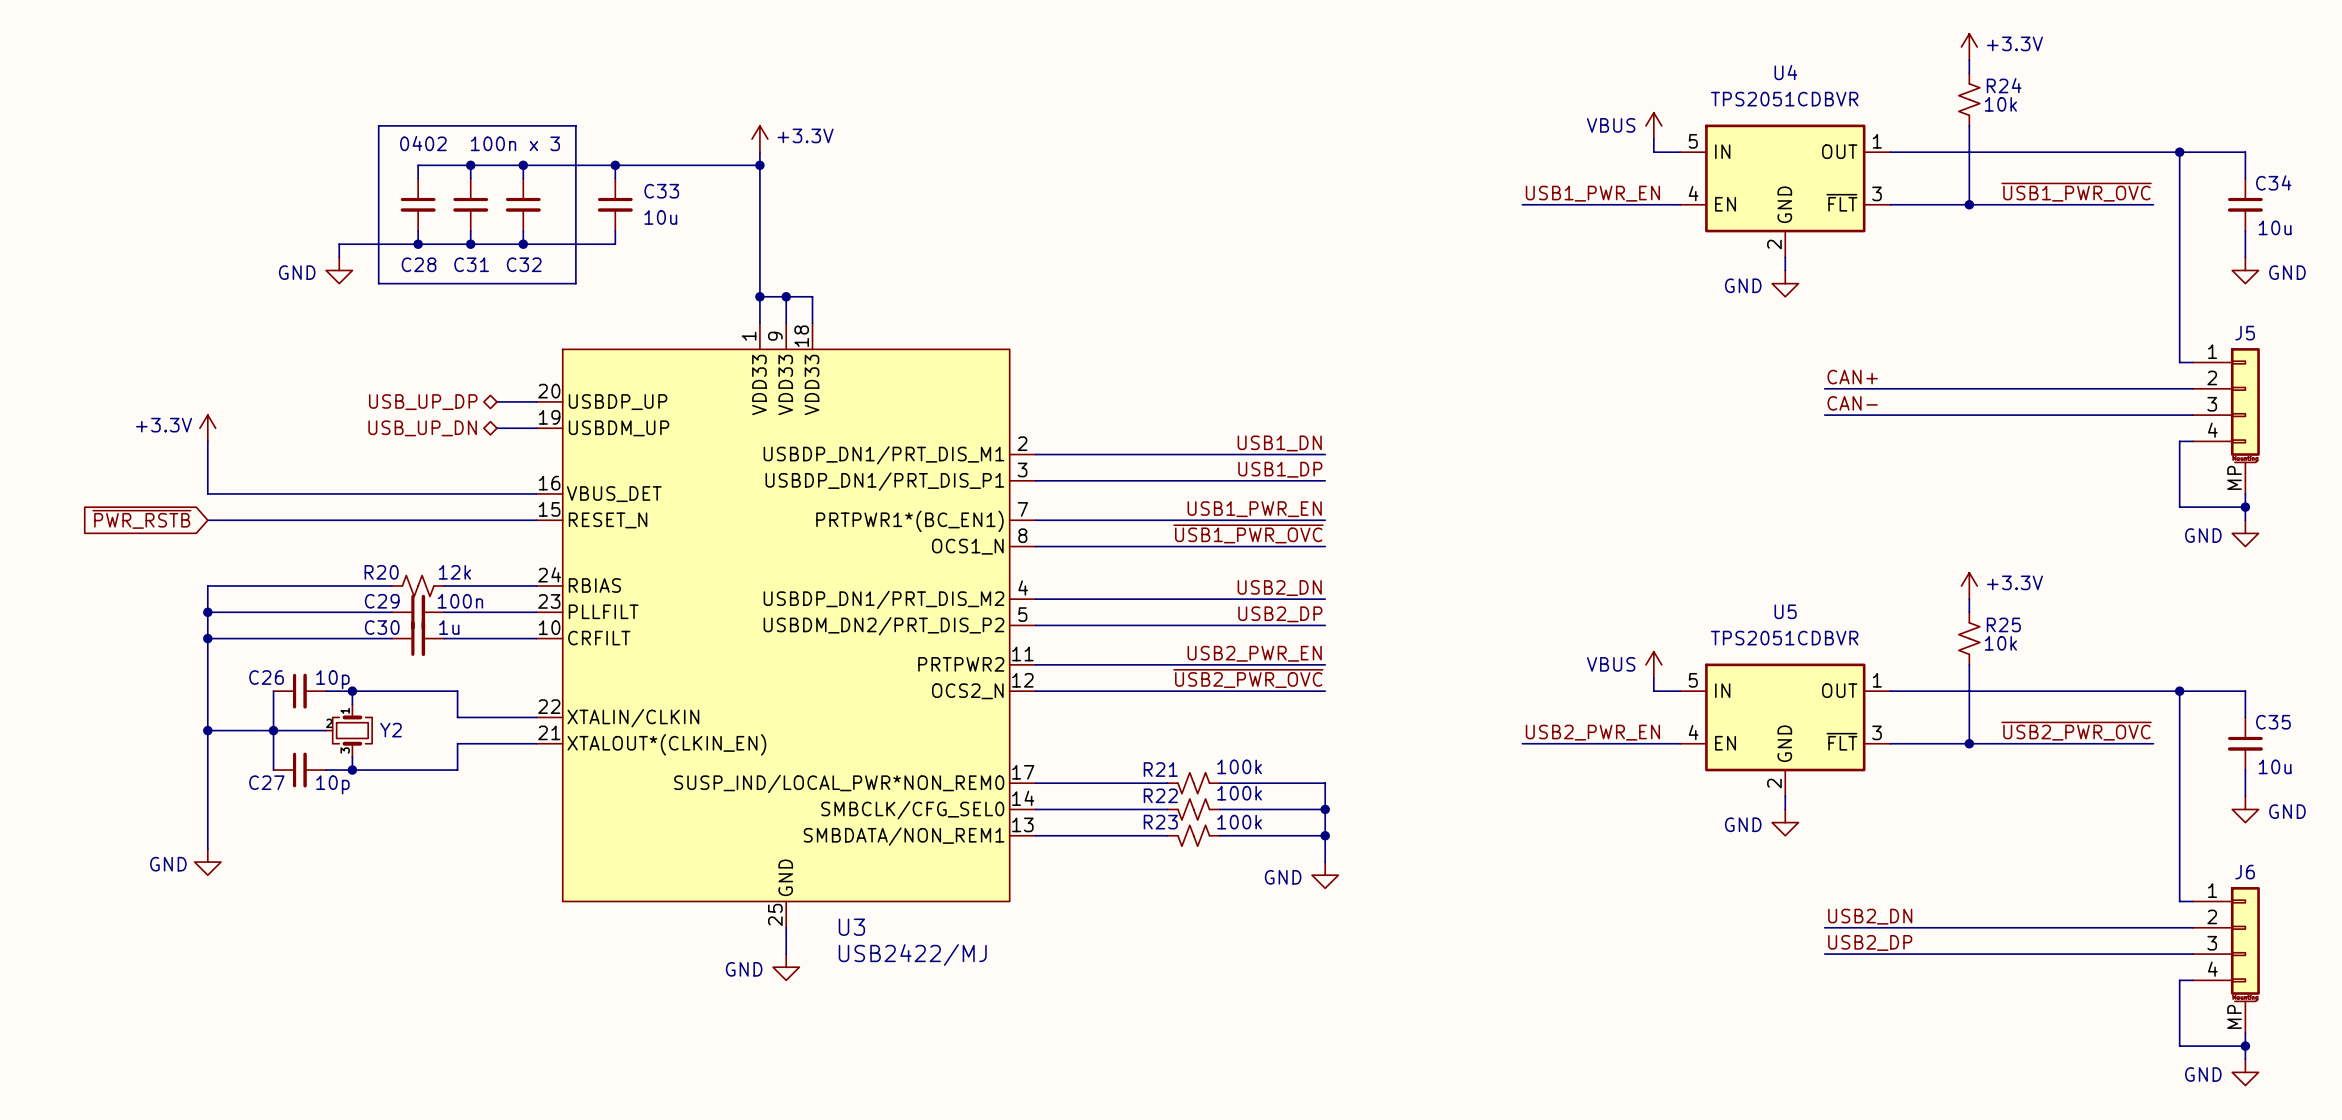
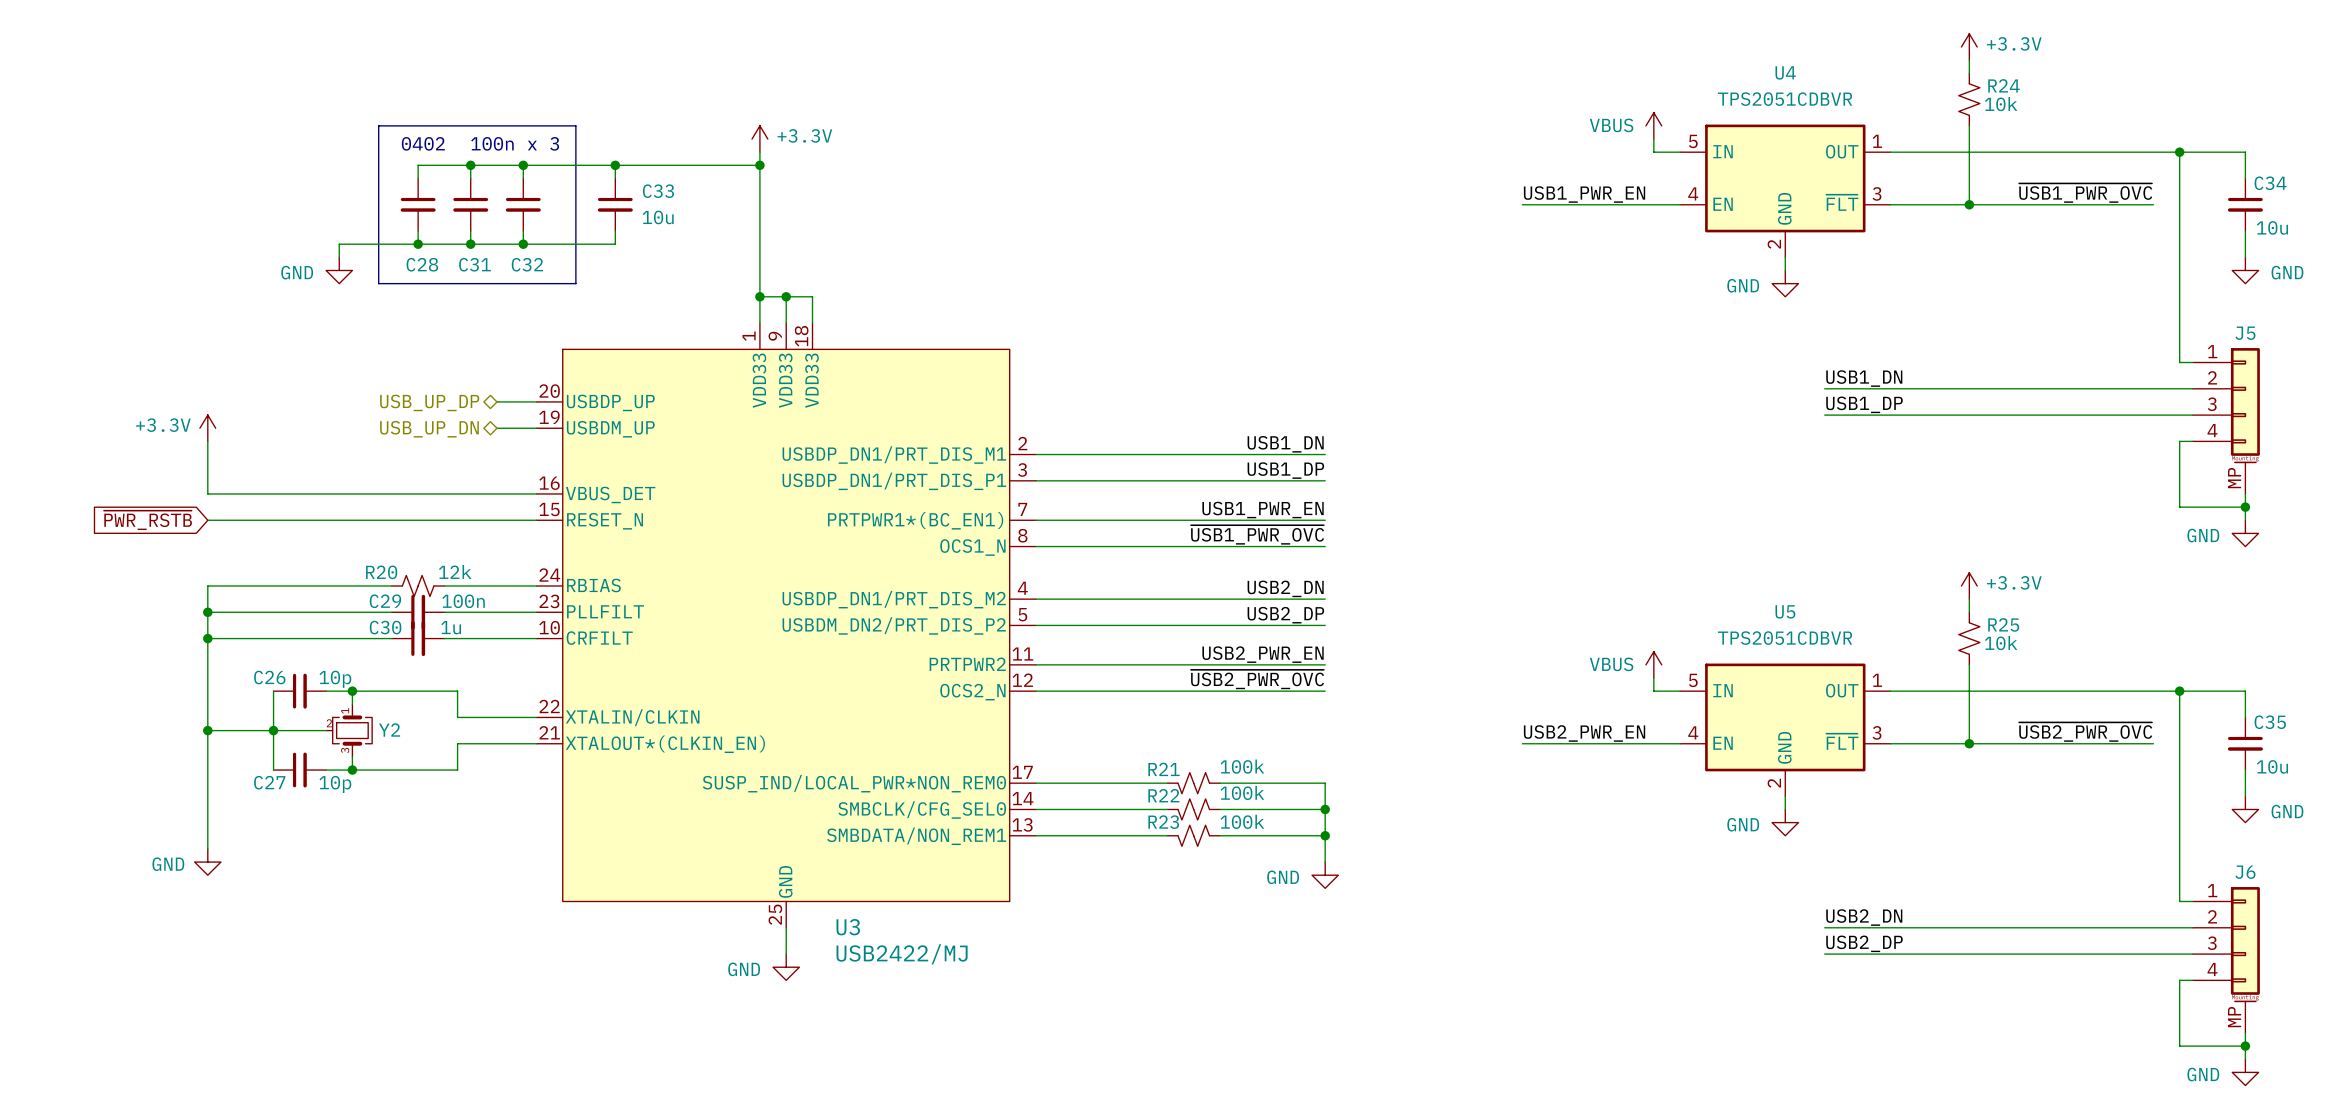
label: CAN+ (1852, 377) -> USB1_DN (1864, 378)
label: CAN- (1852, 403) -> USB1_DP (1864, 404)

